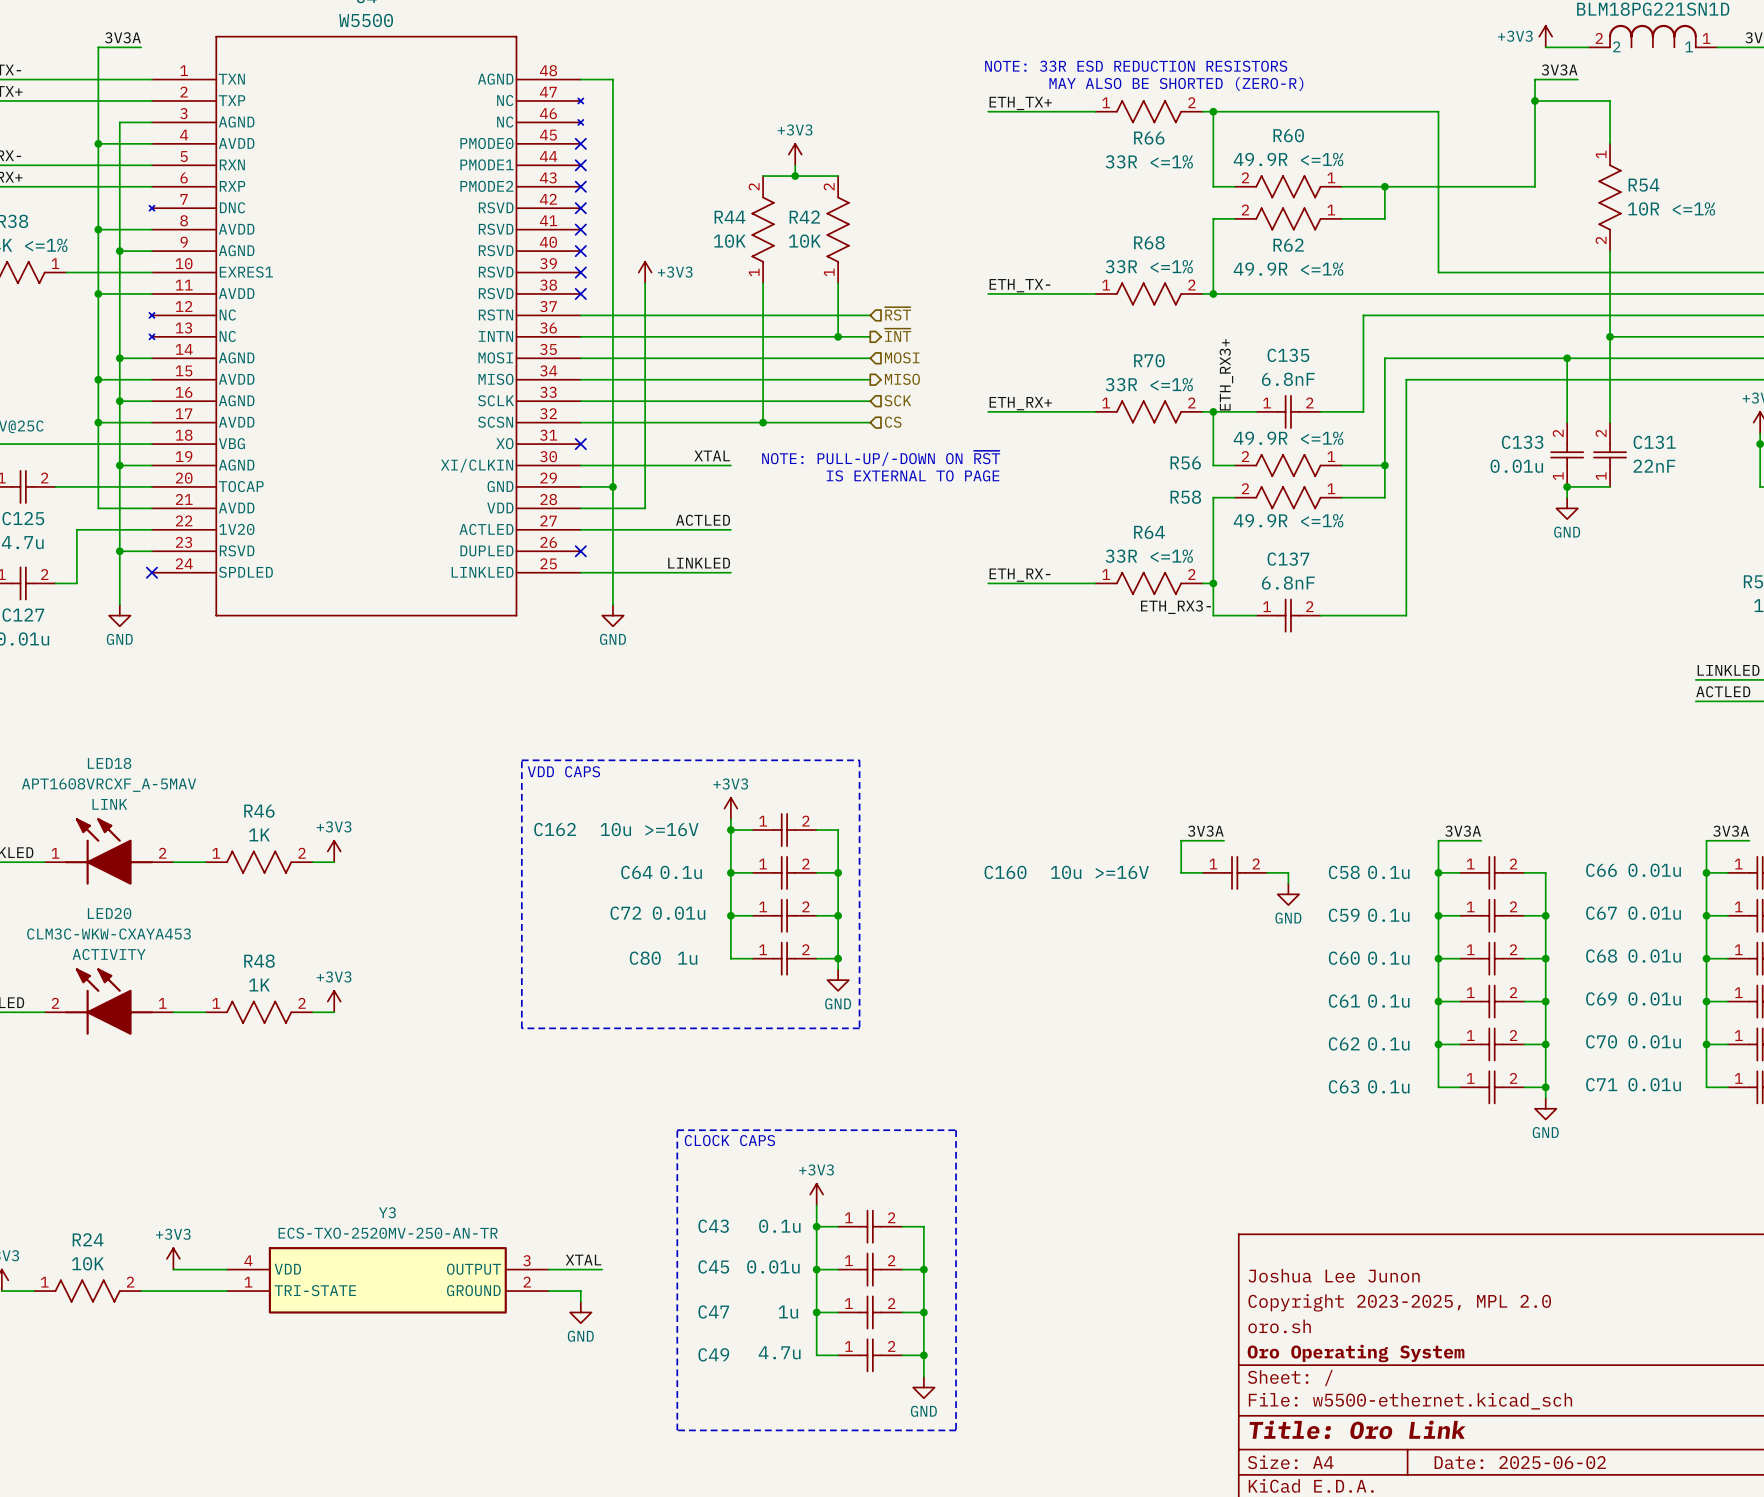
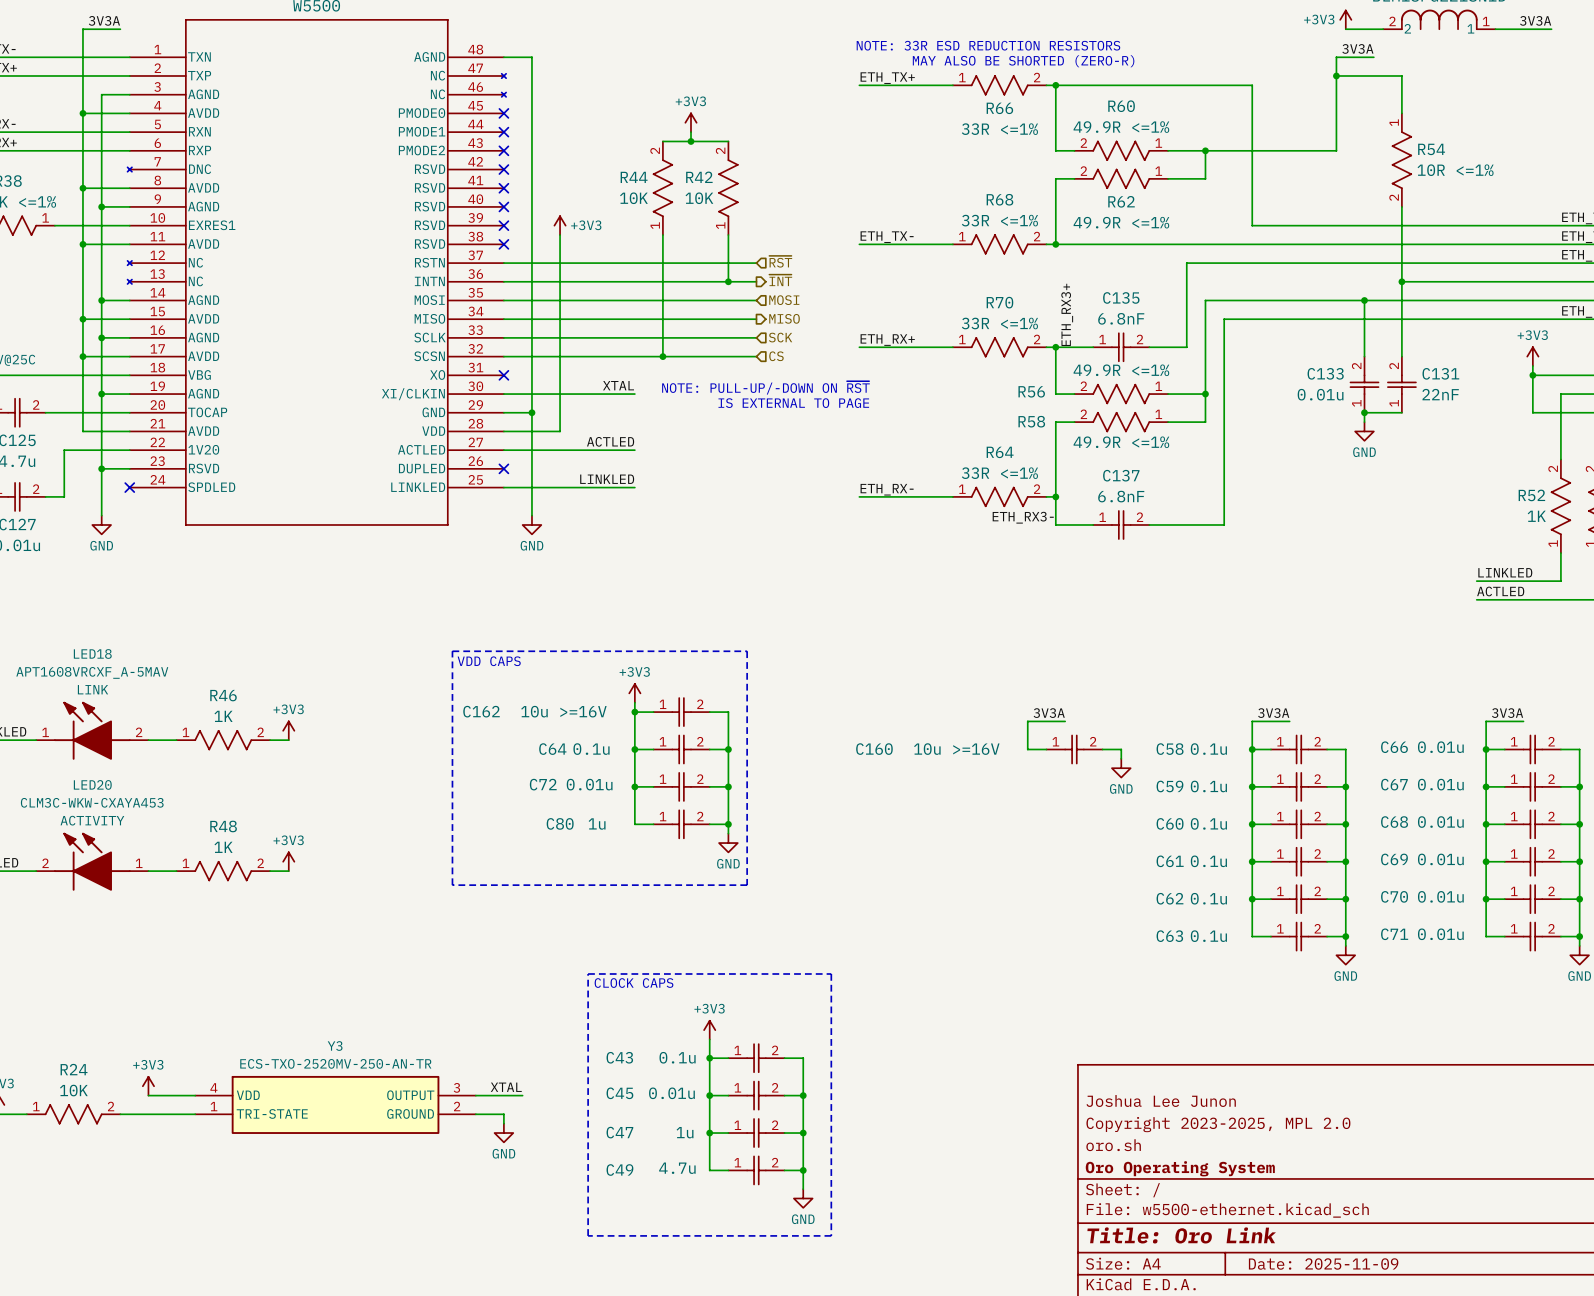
title block: Date: 2025-06-02 (1520, 1462) -> Date: 2025-11-09 (1323, 1264)

